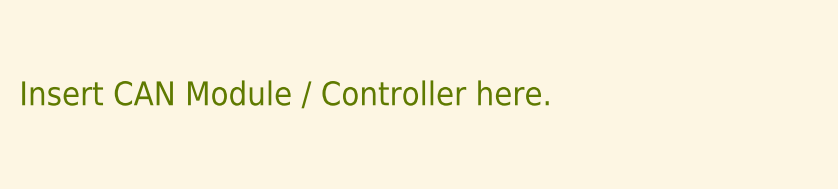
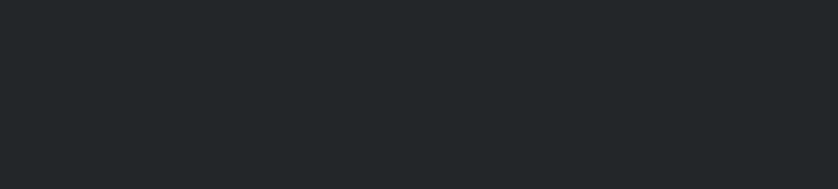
text: Insert CAN Module / Controller here. (285, 94) -> none

